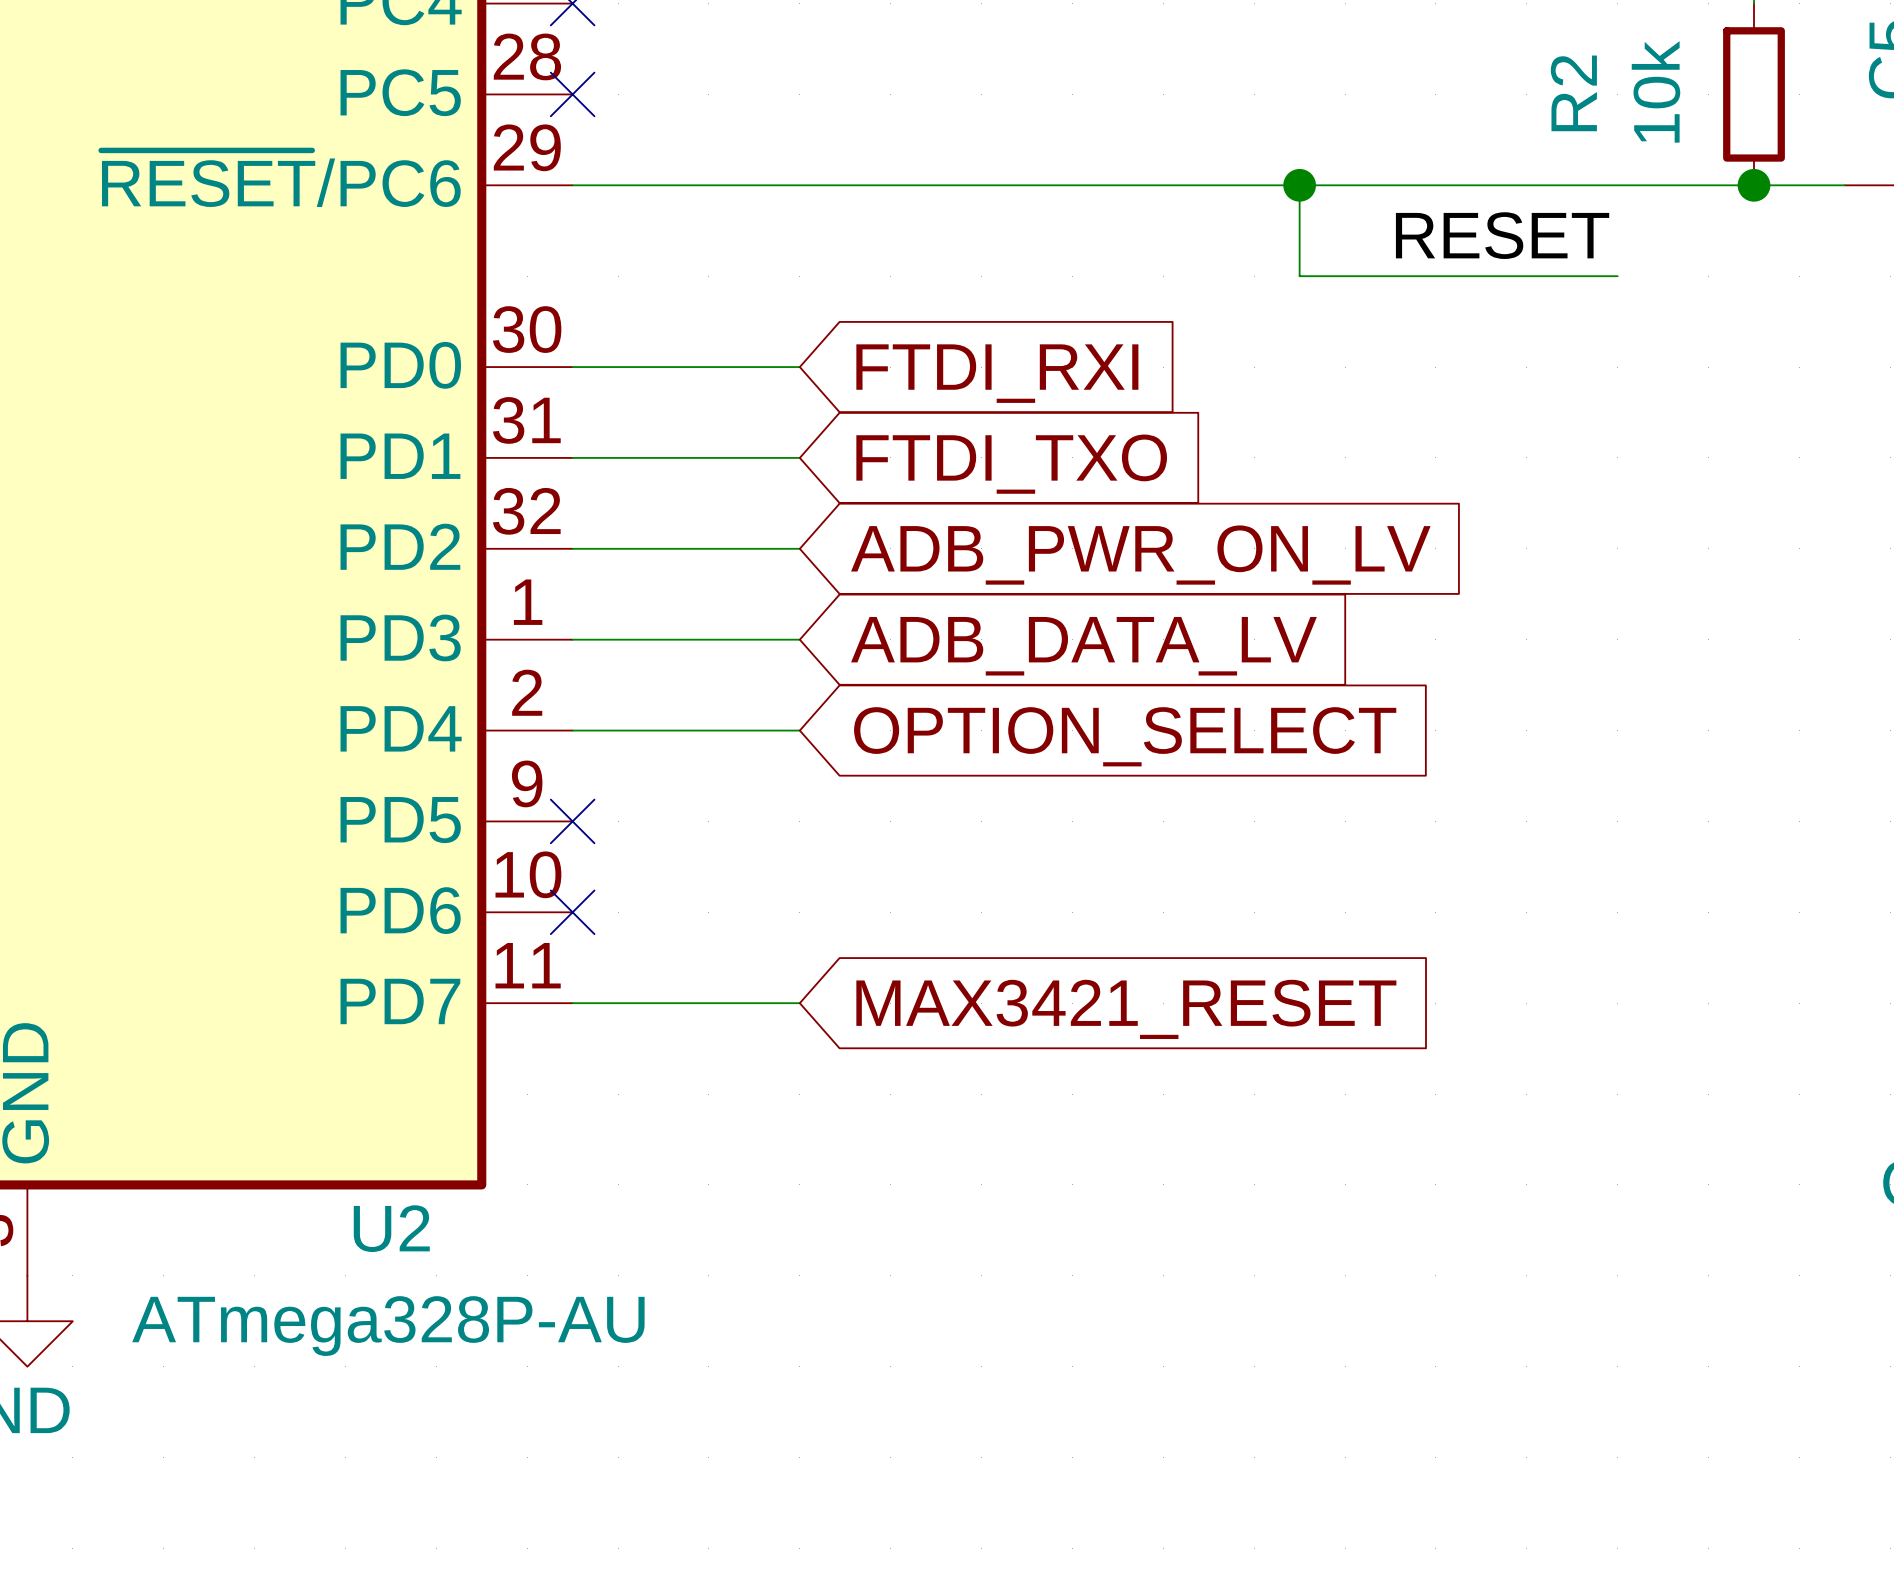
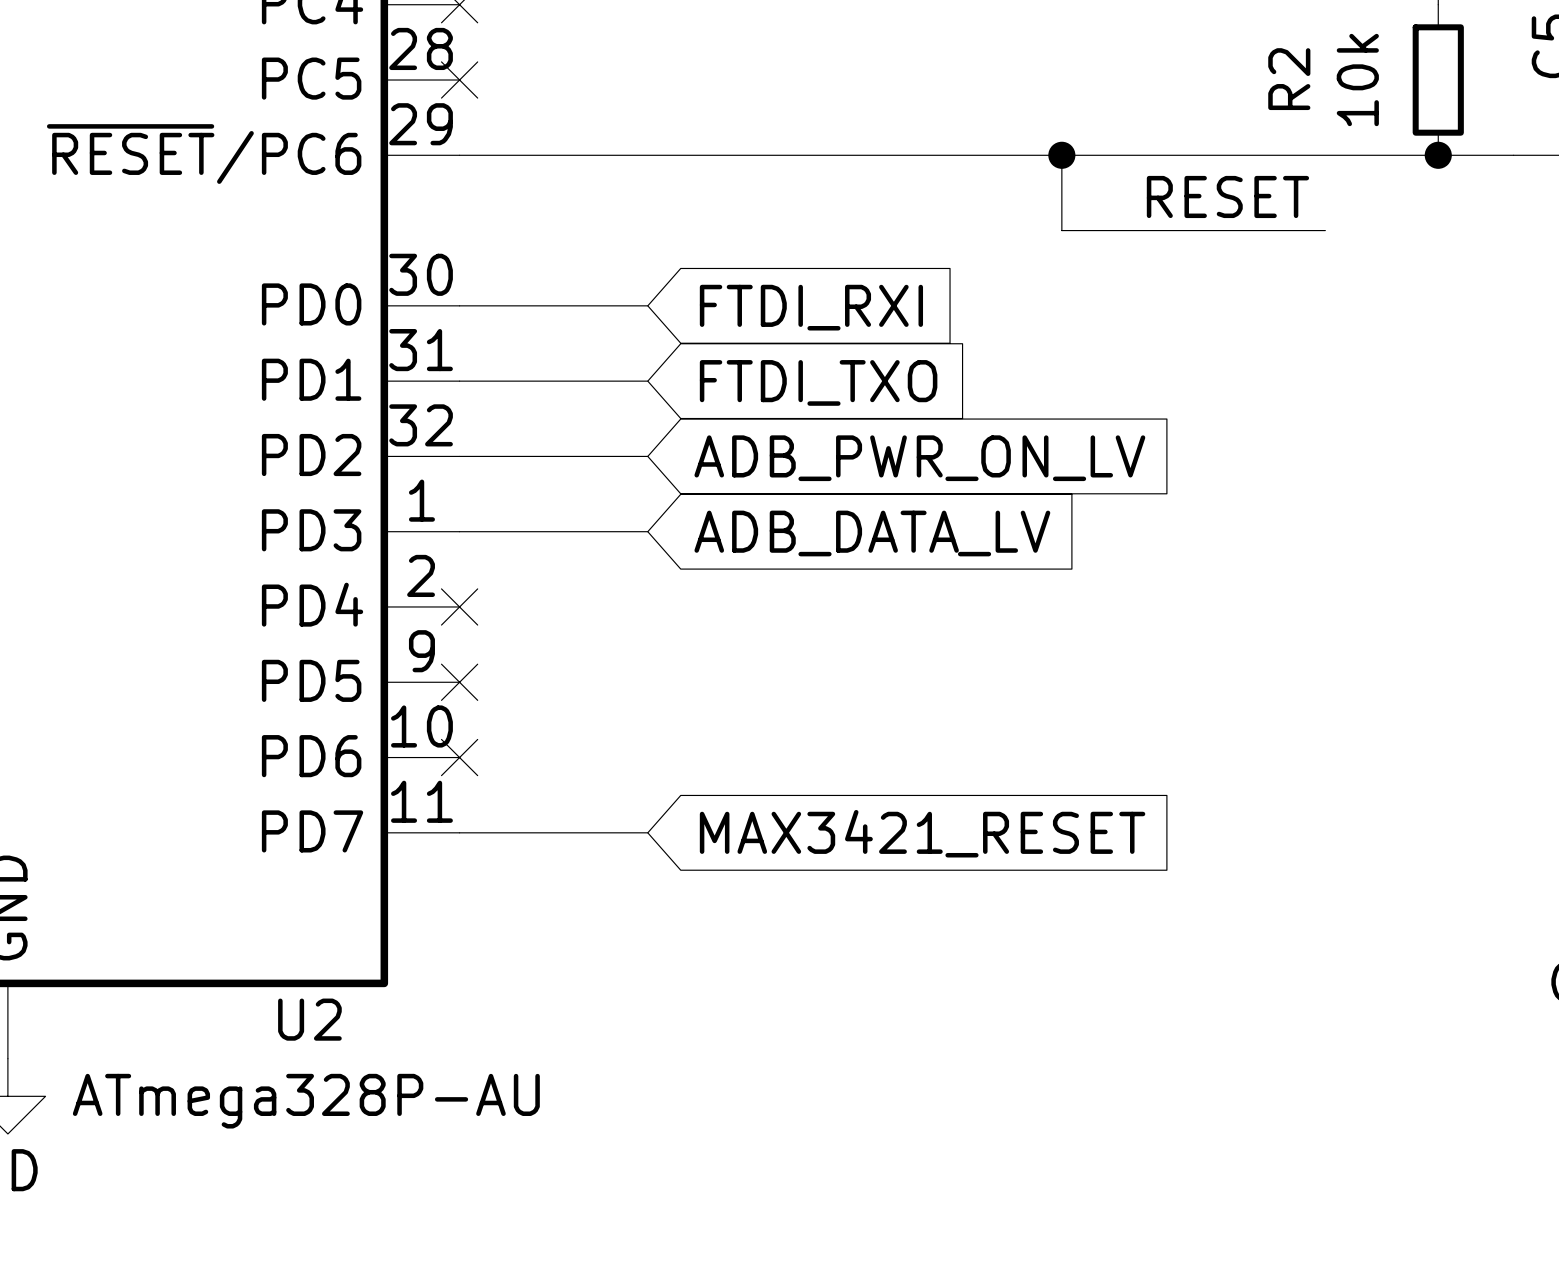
wire: (572, 730) (799, 730) -> none
no-connect mark: none -> (459, 606)
global label: OPTION_SELECT (1125, 736) -> none

